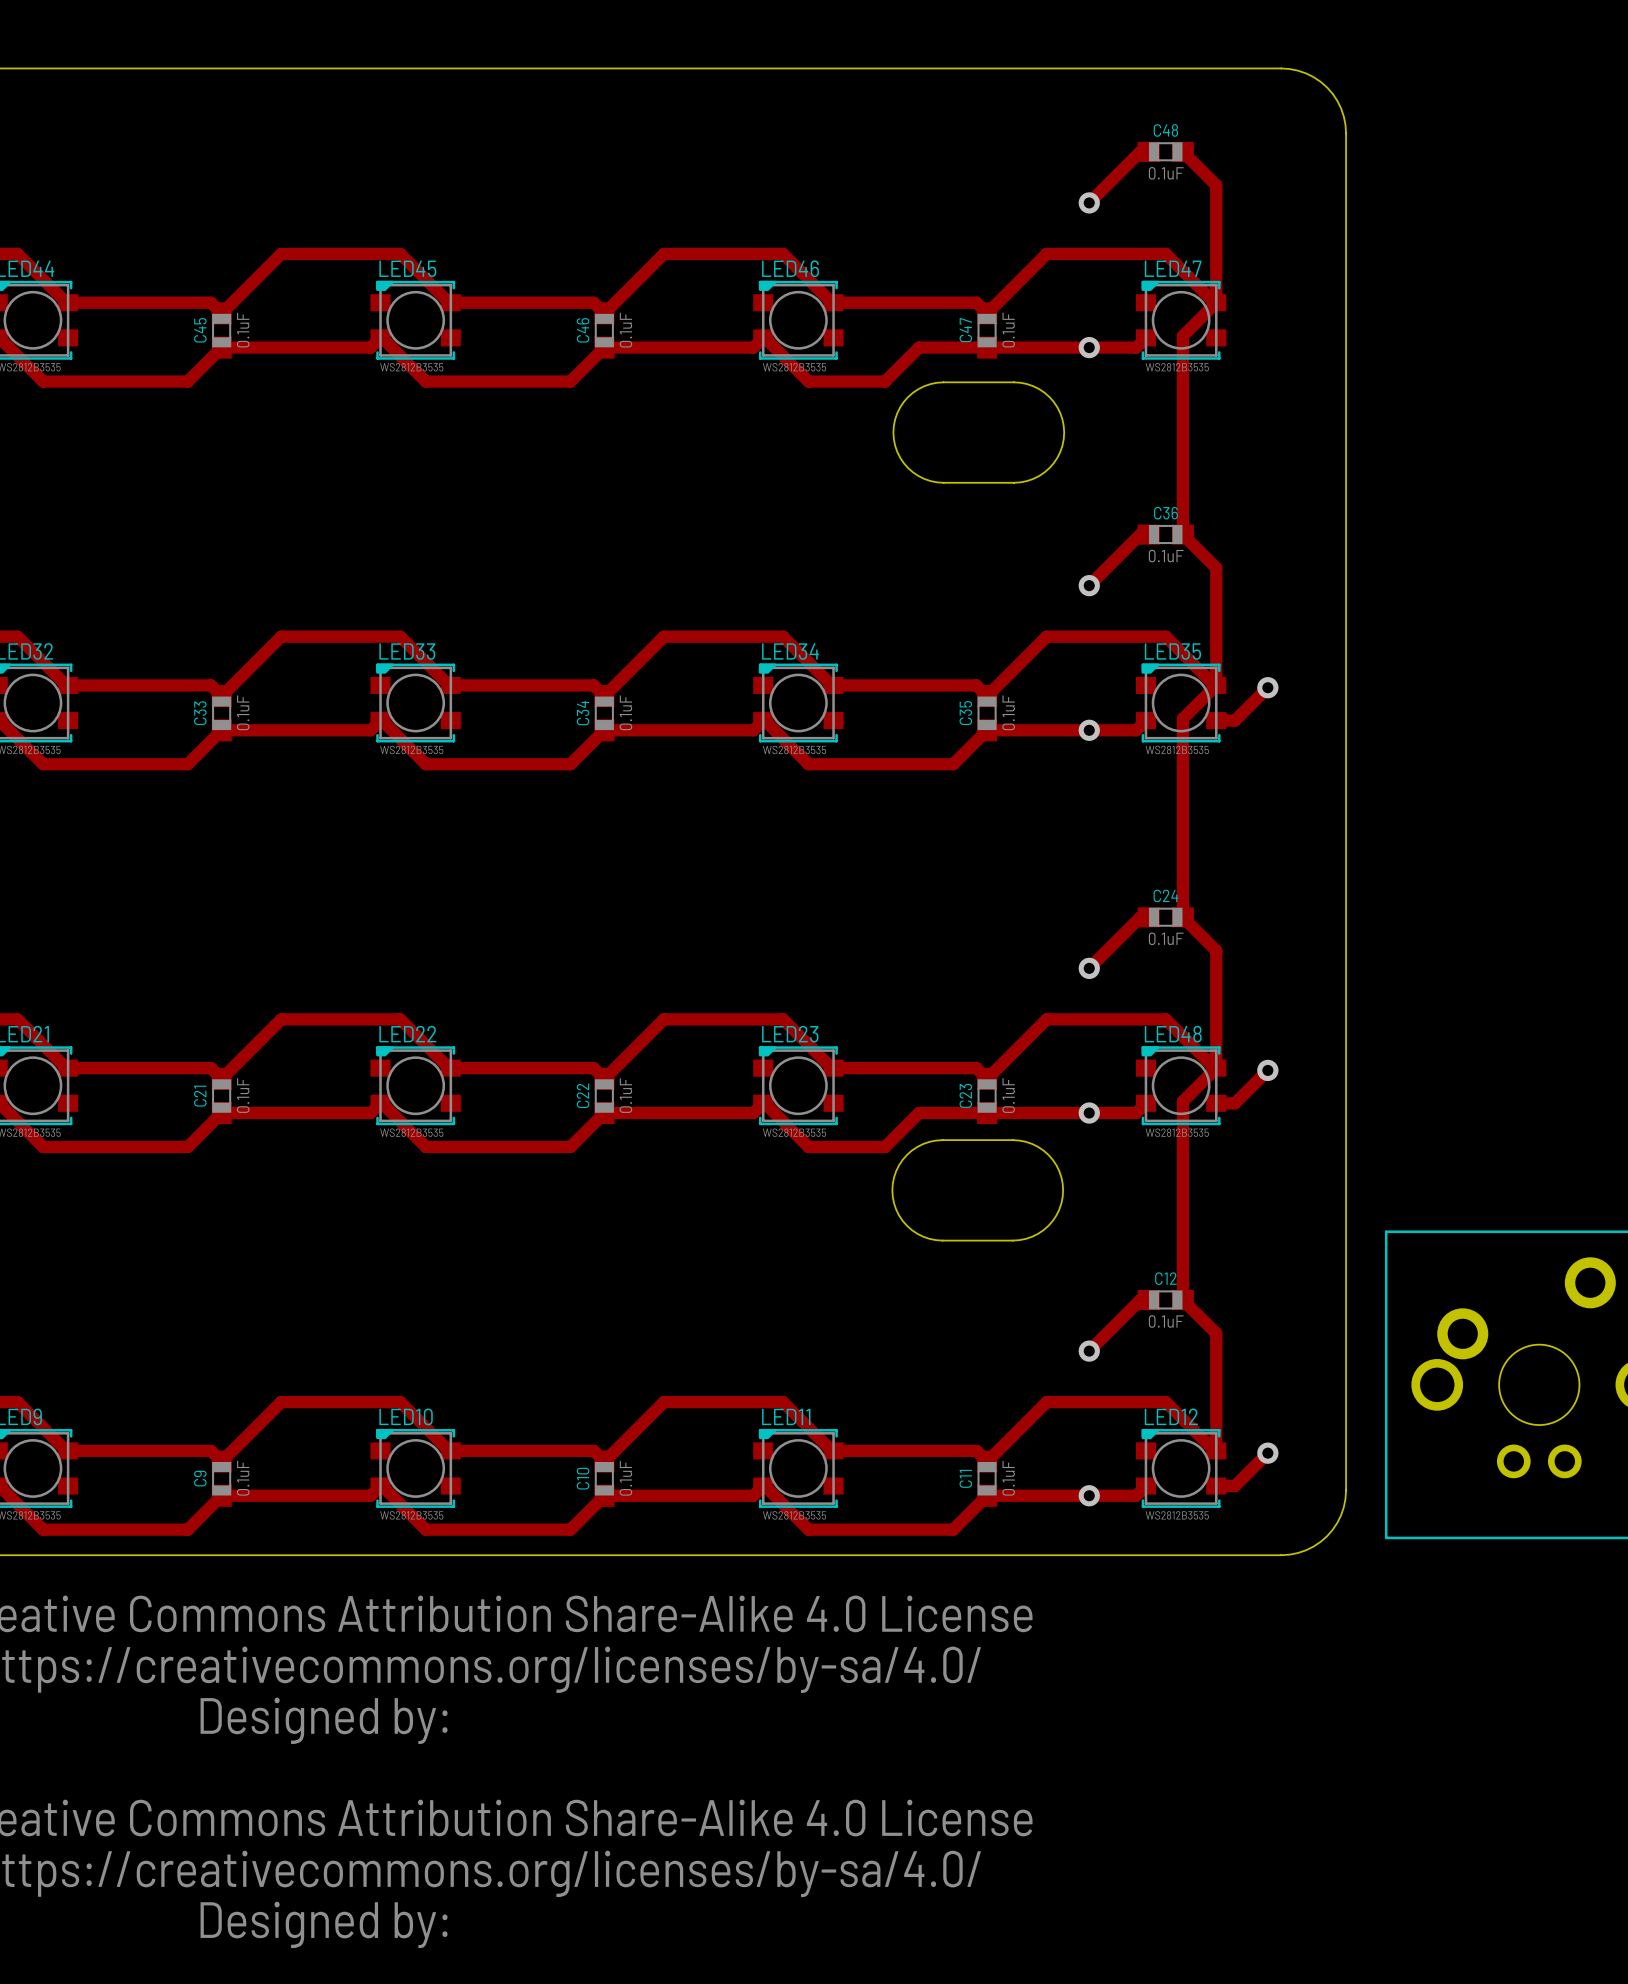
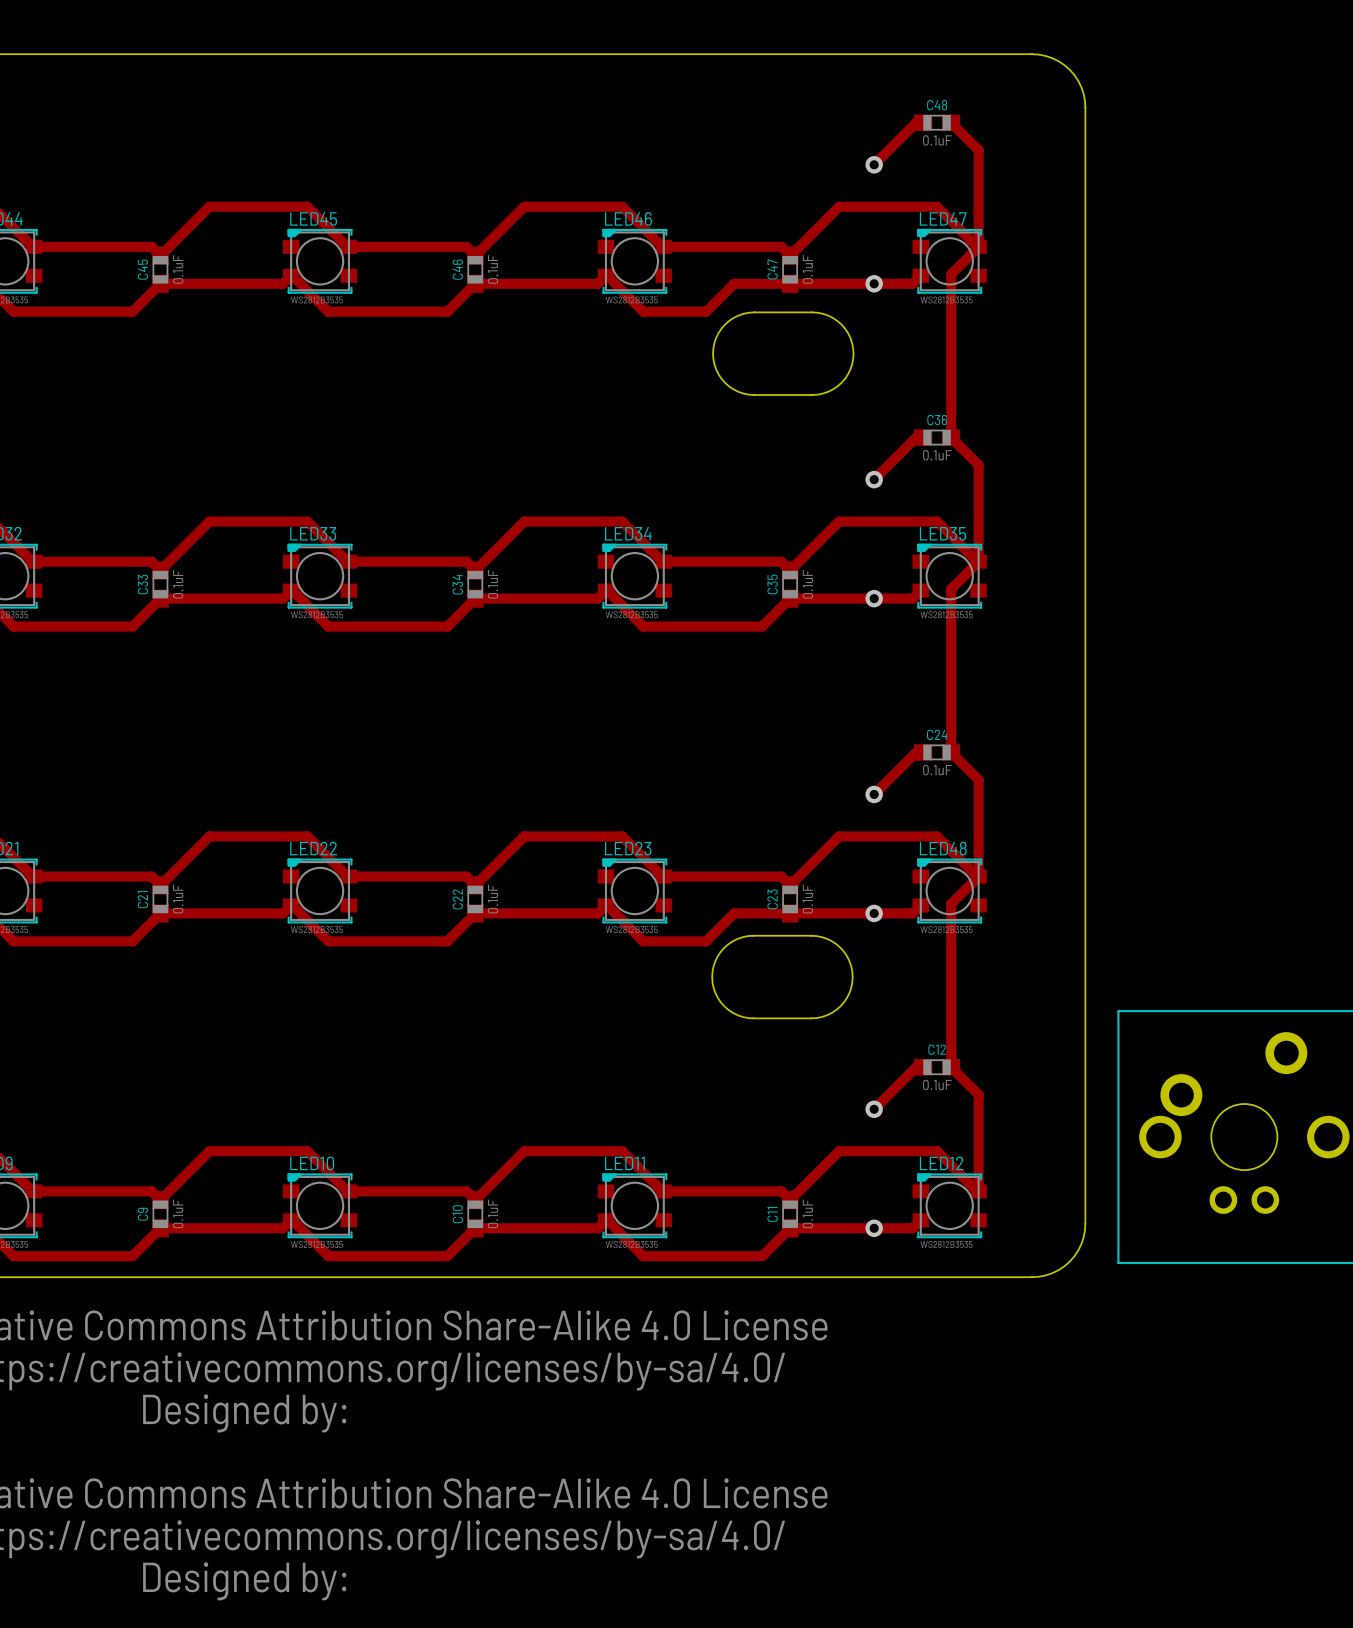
track: (1267, 687) (1234, 720) (1216, 720) -> none
via: (1267, 687) -> none
track: (1267, 1070) (1234, 1103) (1216, 1103) -> none
via: (1267, 1070) -> none
track: (1267, 1453) (1234, 1486) (1216, 1486) -> none
via: (1267, 1453) -> none

